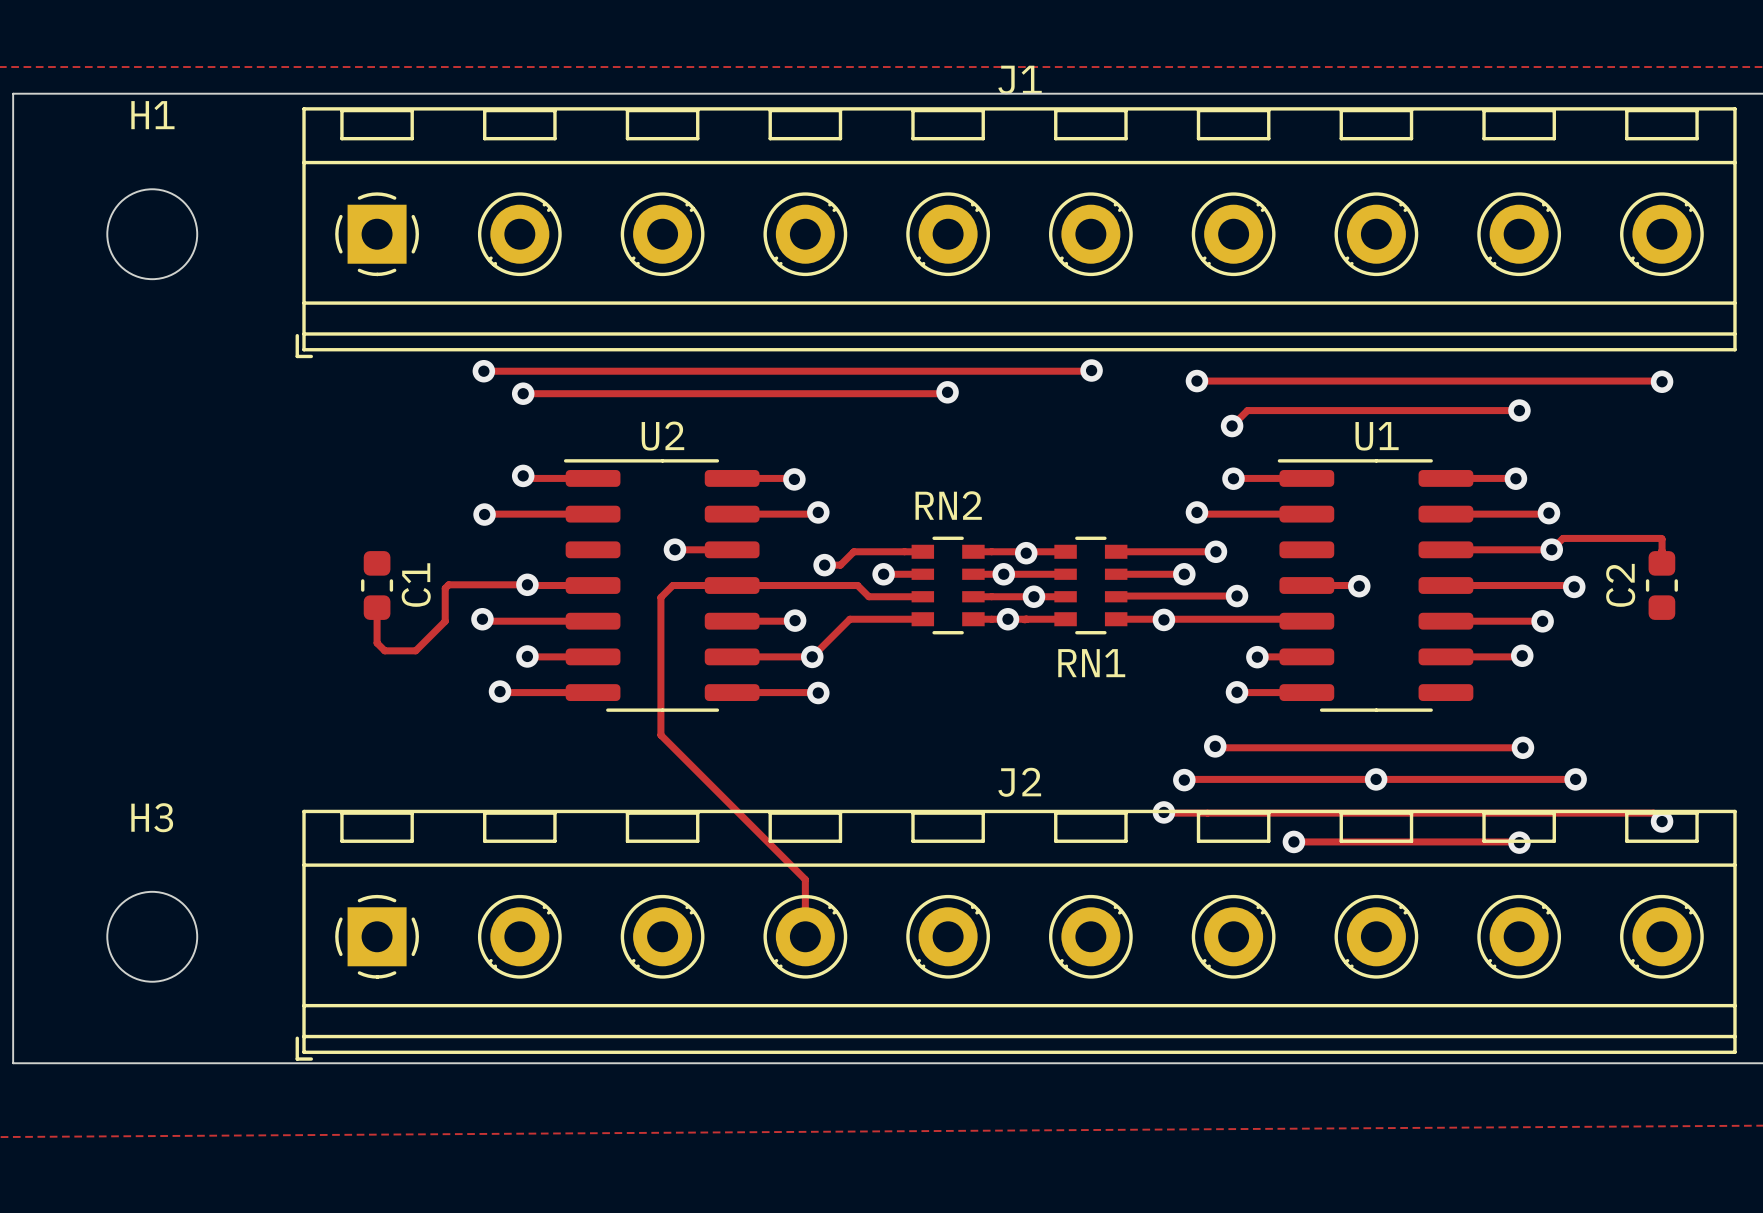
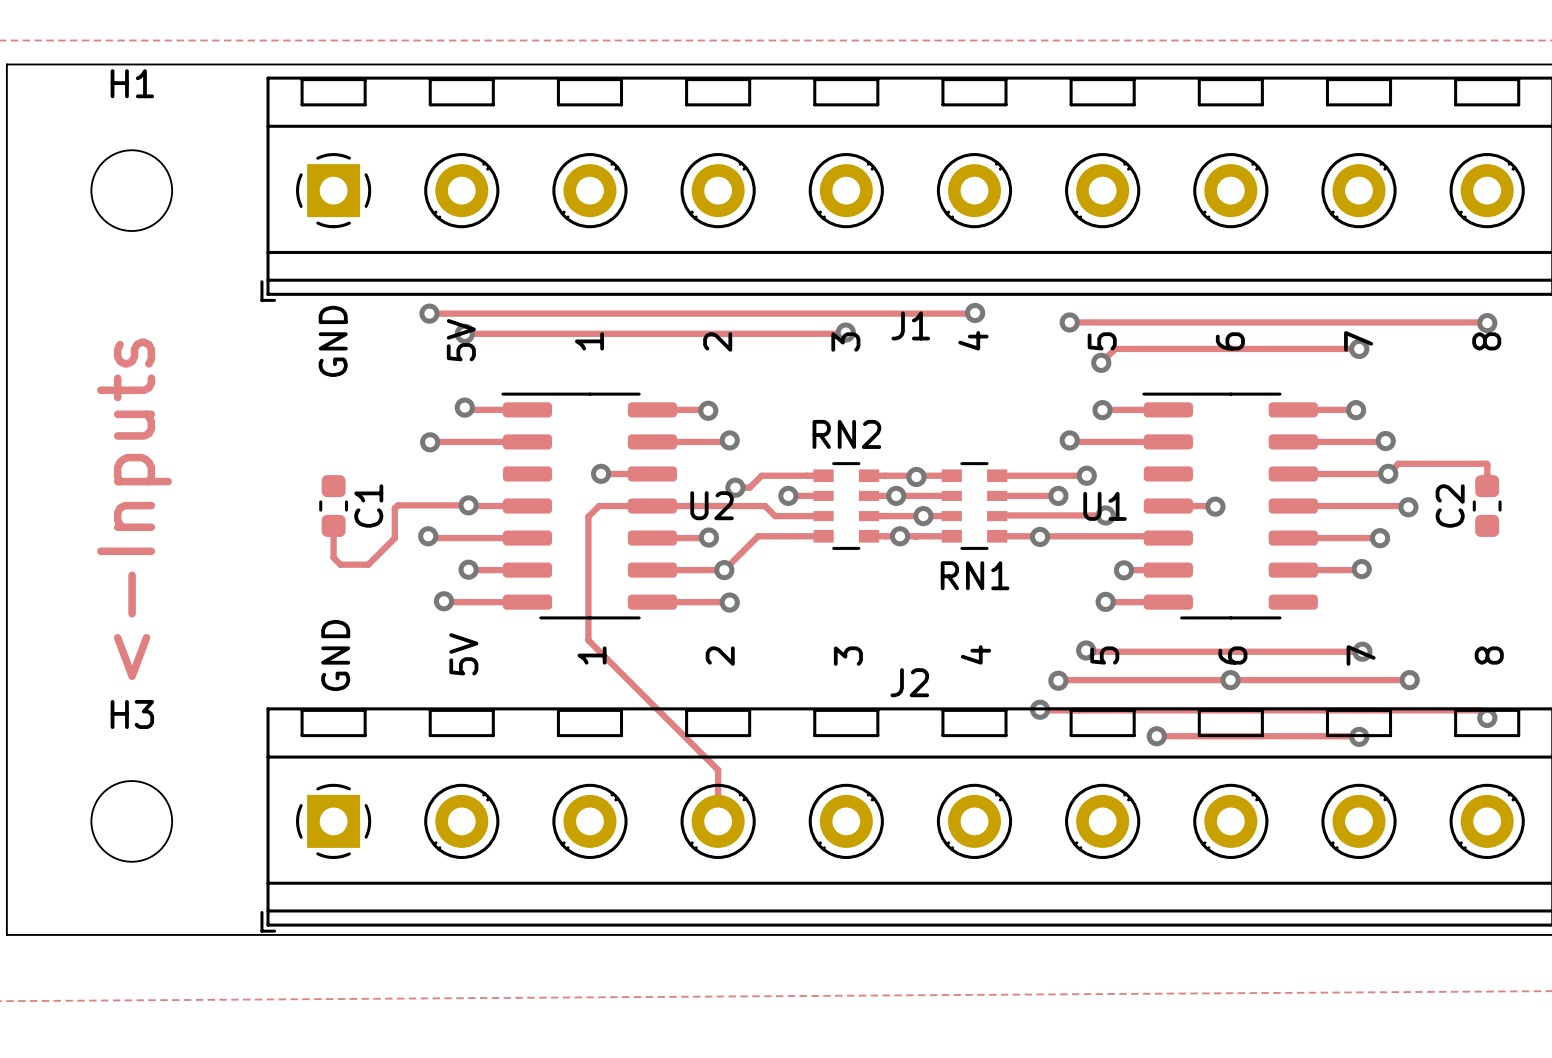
J1 name position: J1 (1020, 79) -> J1 (910, 325)
drawing: none -> [318, 305, 1502, 377]
U2 name position: U2 (662, 436) -> U2 (712, 505)
U1 name position: U1 (1377, 436) -> U1 (1105, 506)
text: none -> <-Inputs (134, 509)
drawing: none -> [321, 619, 1504, 692]

